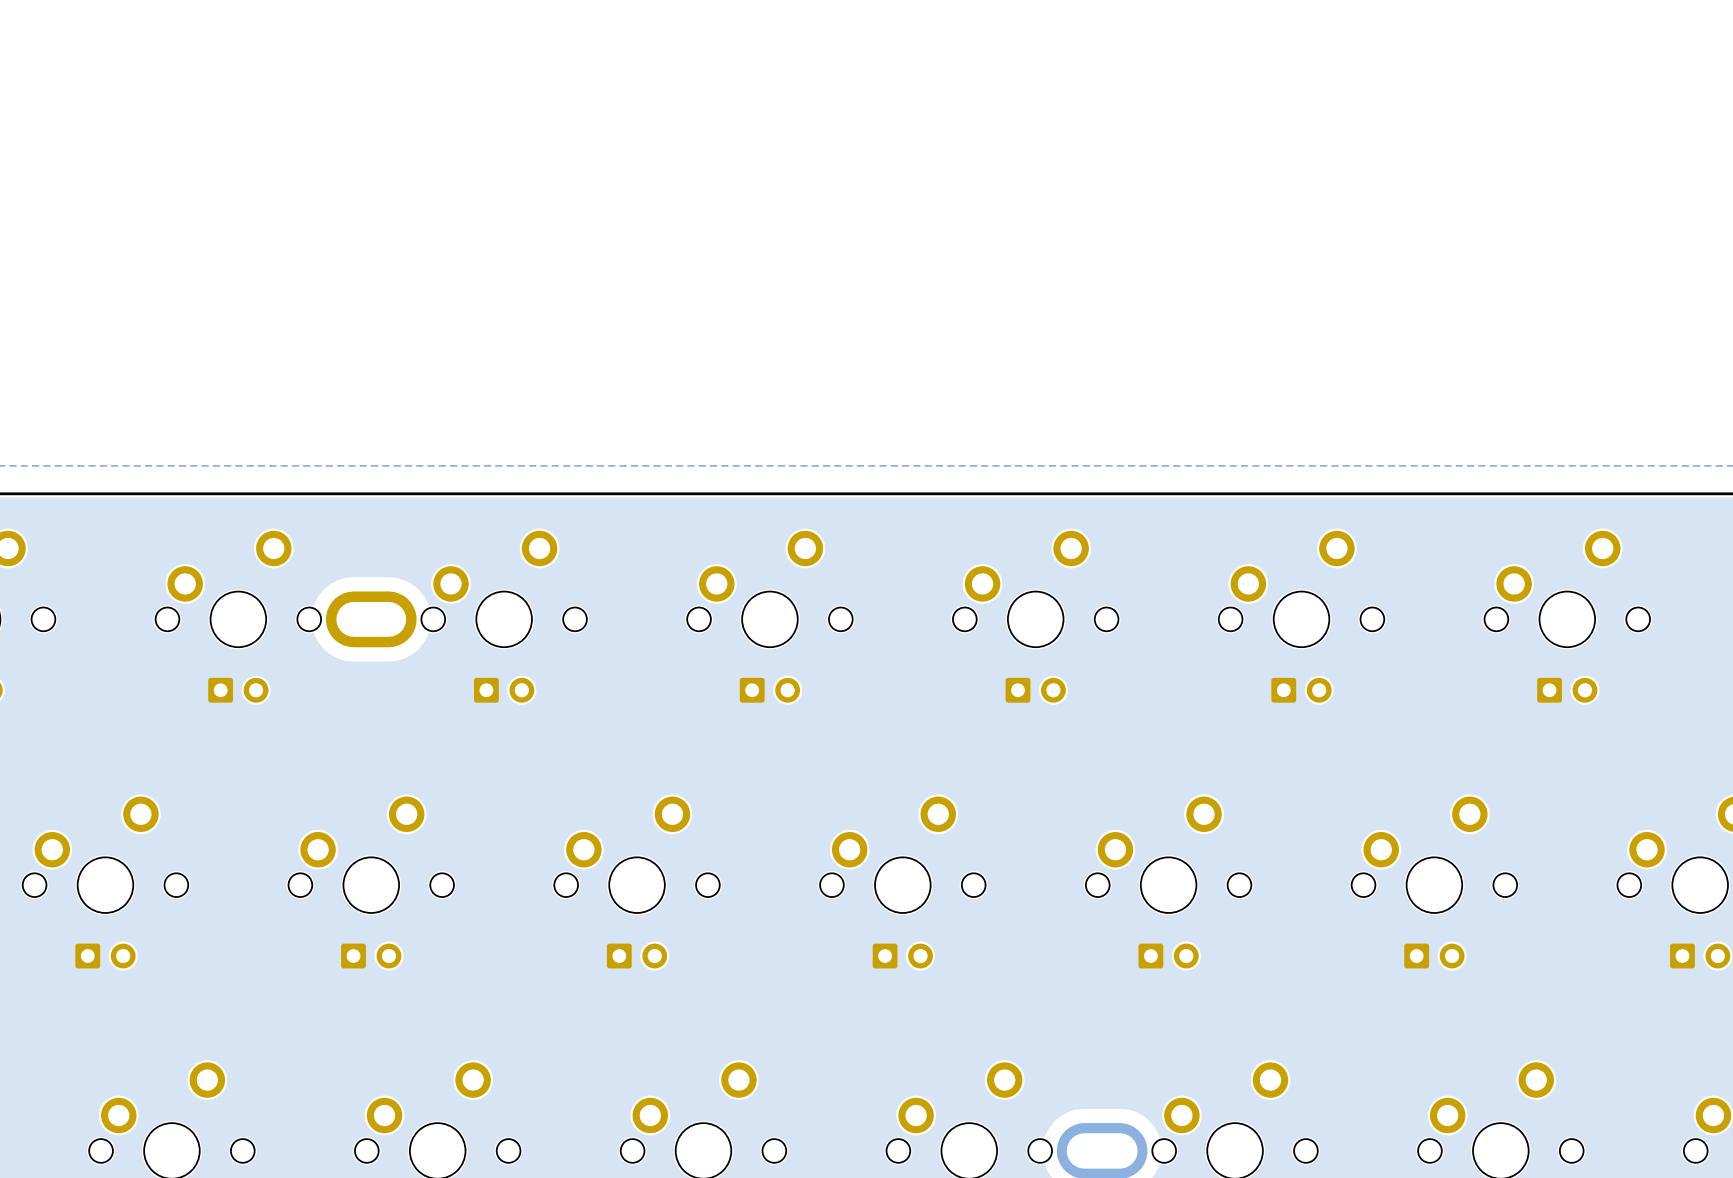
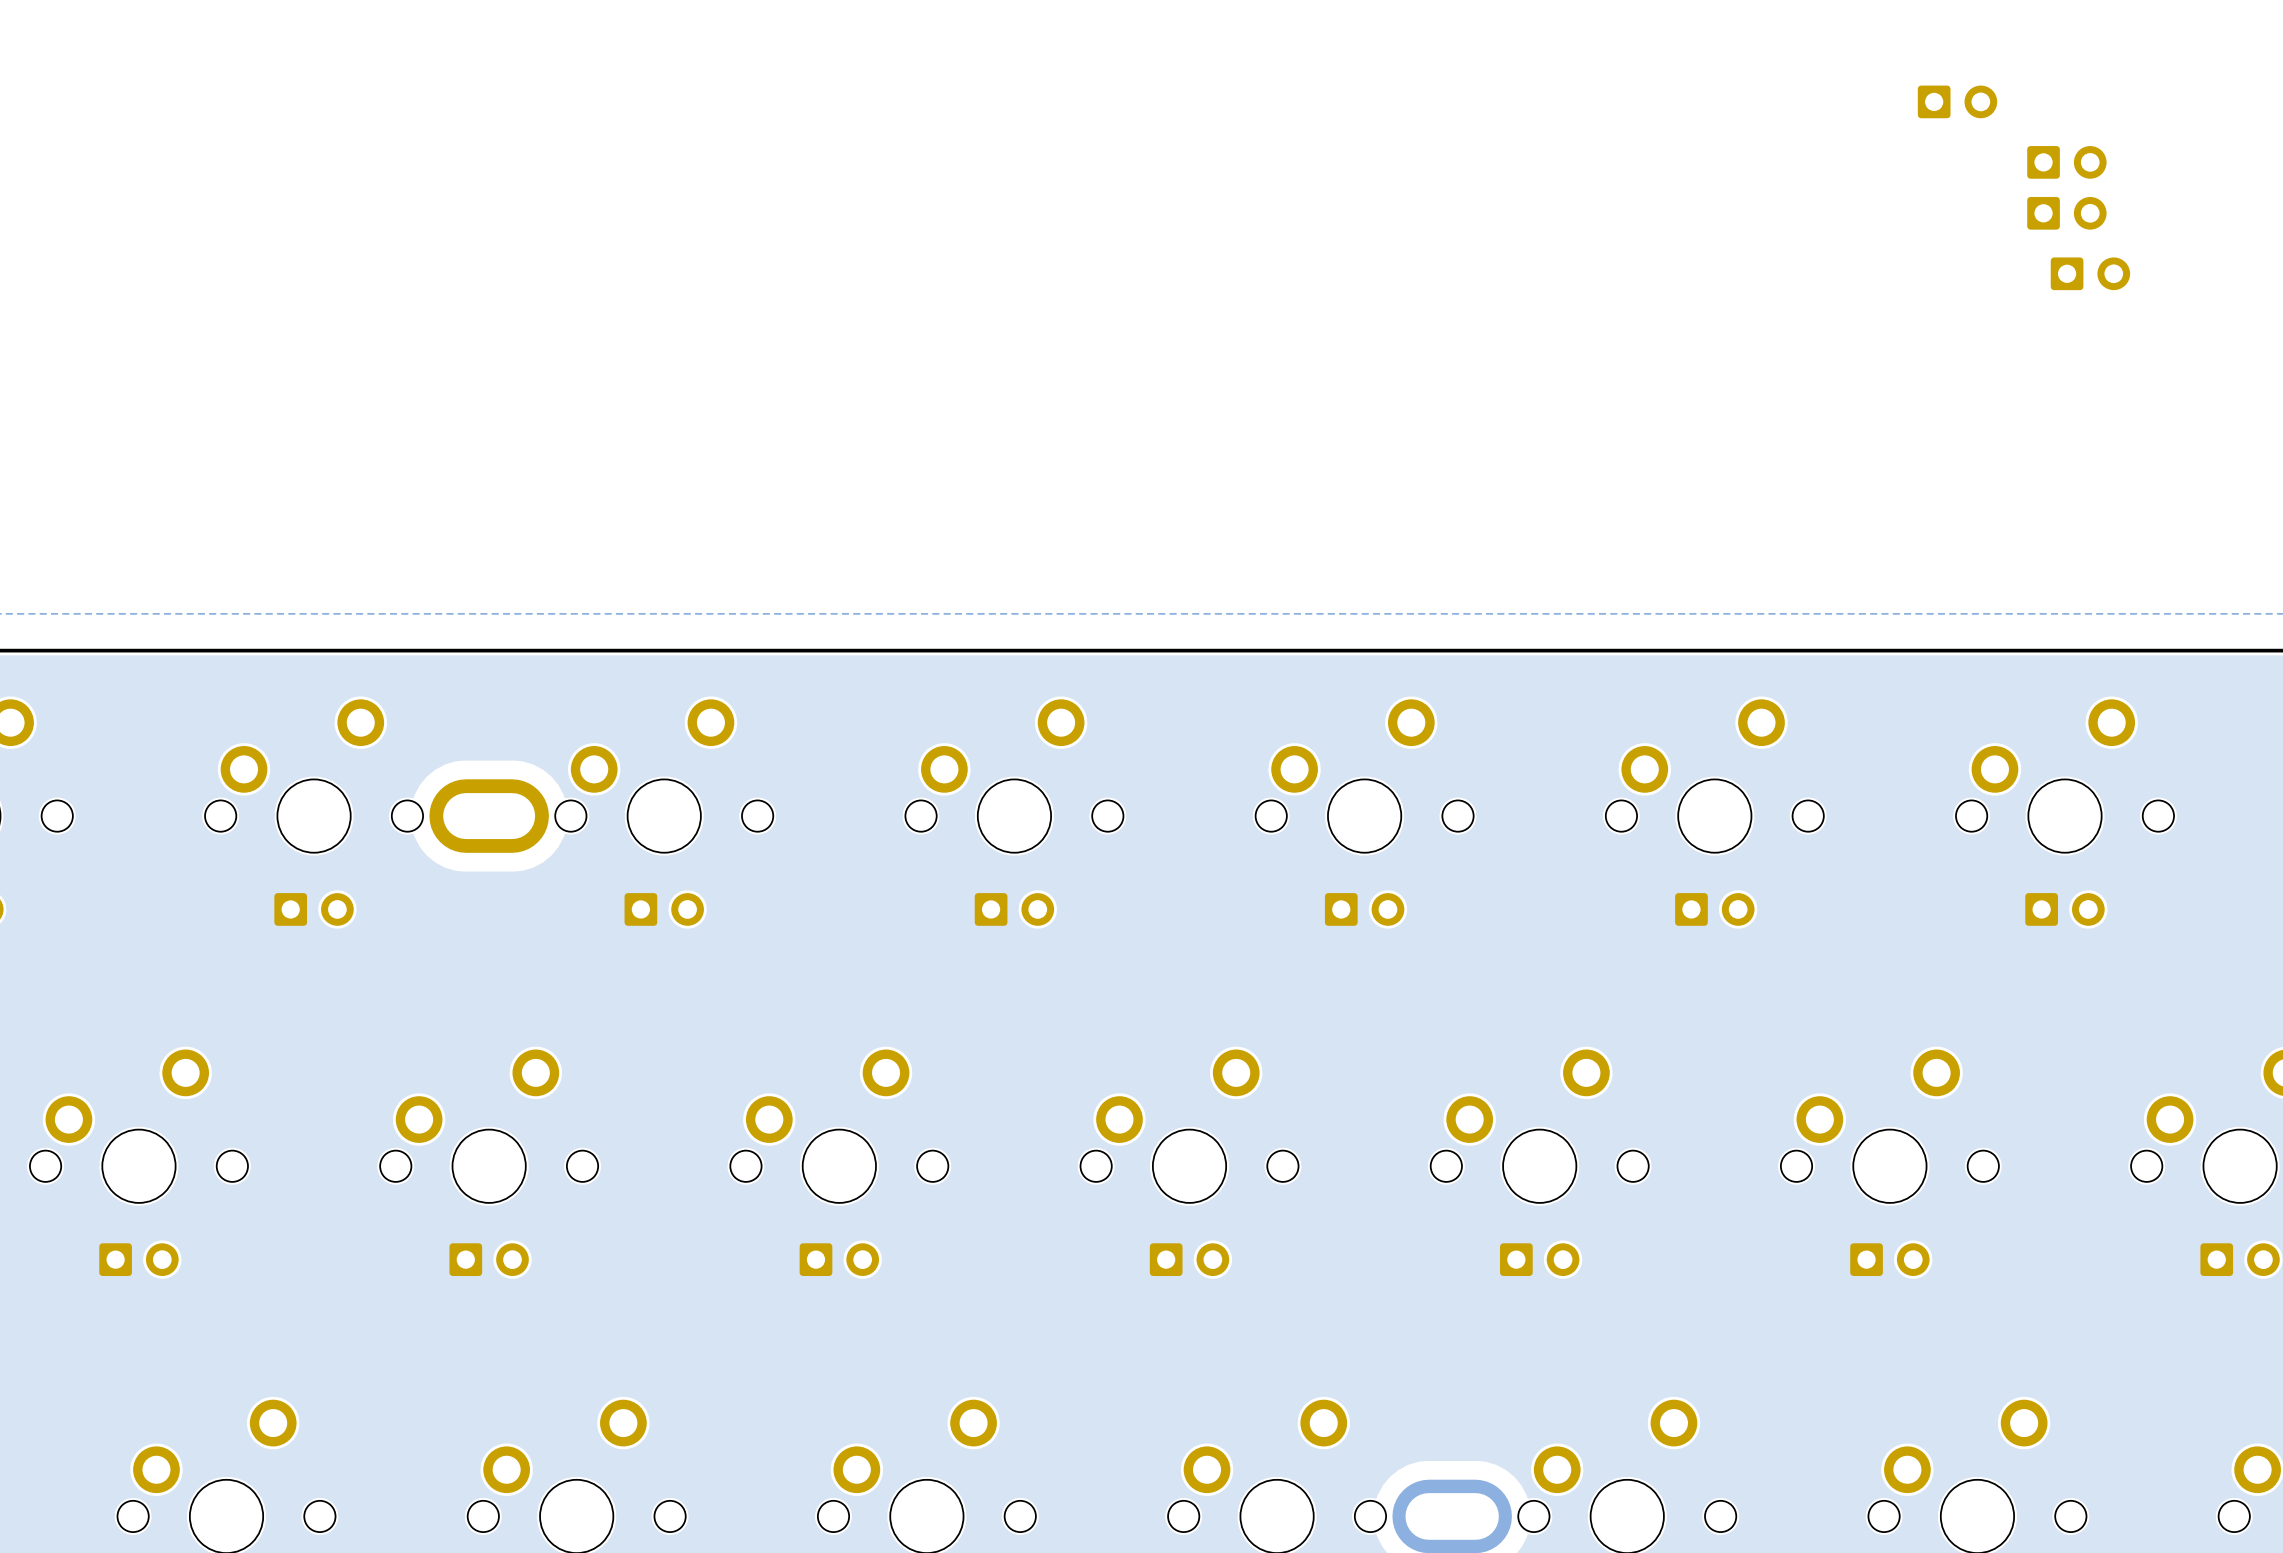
part: none -> (1957, 101)
part: none -> (2066, 162)
part: none -> (2066, 213)
part: none -> (2090, 273)

